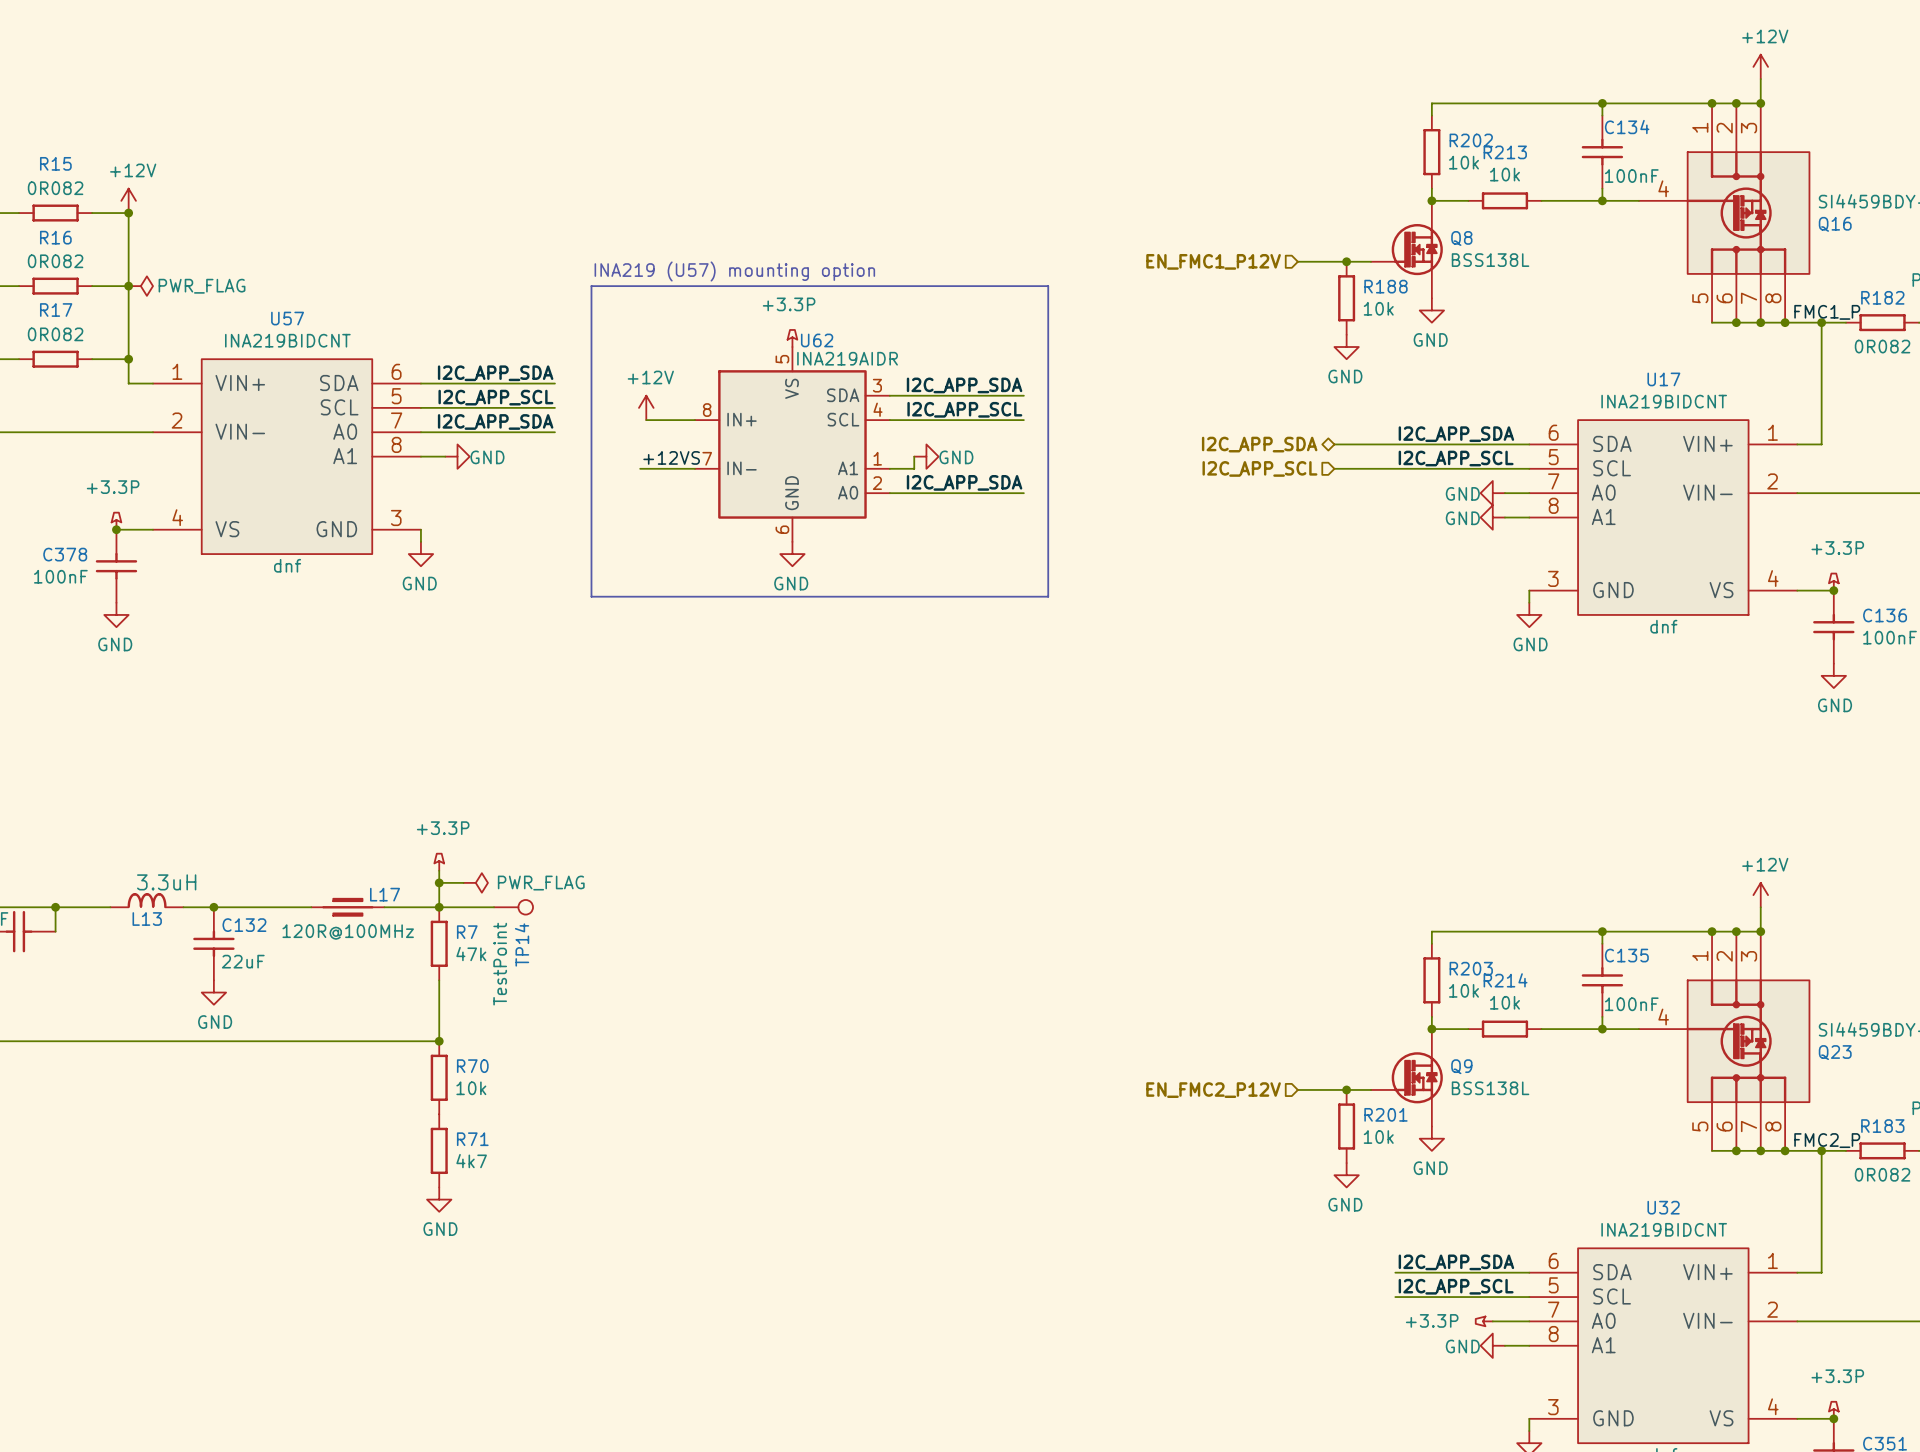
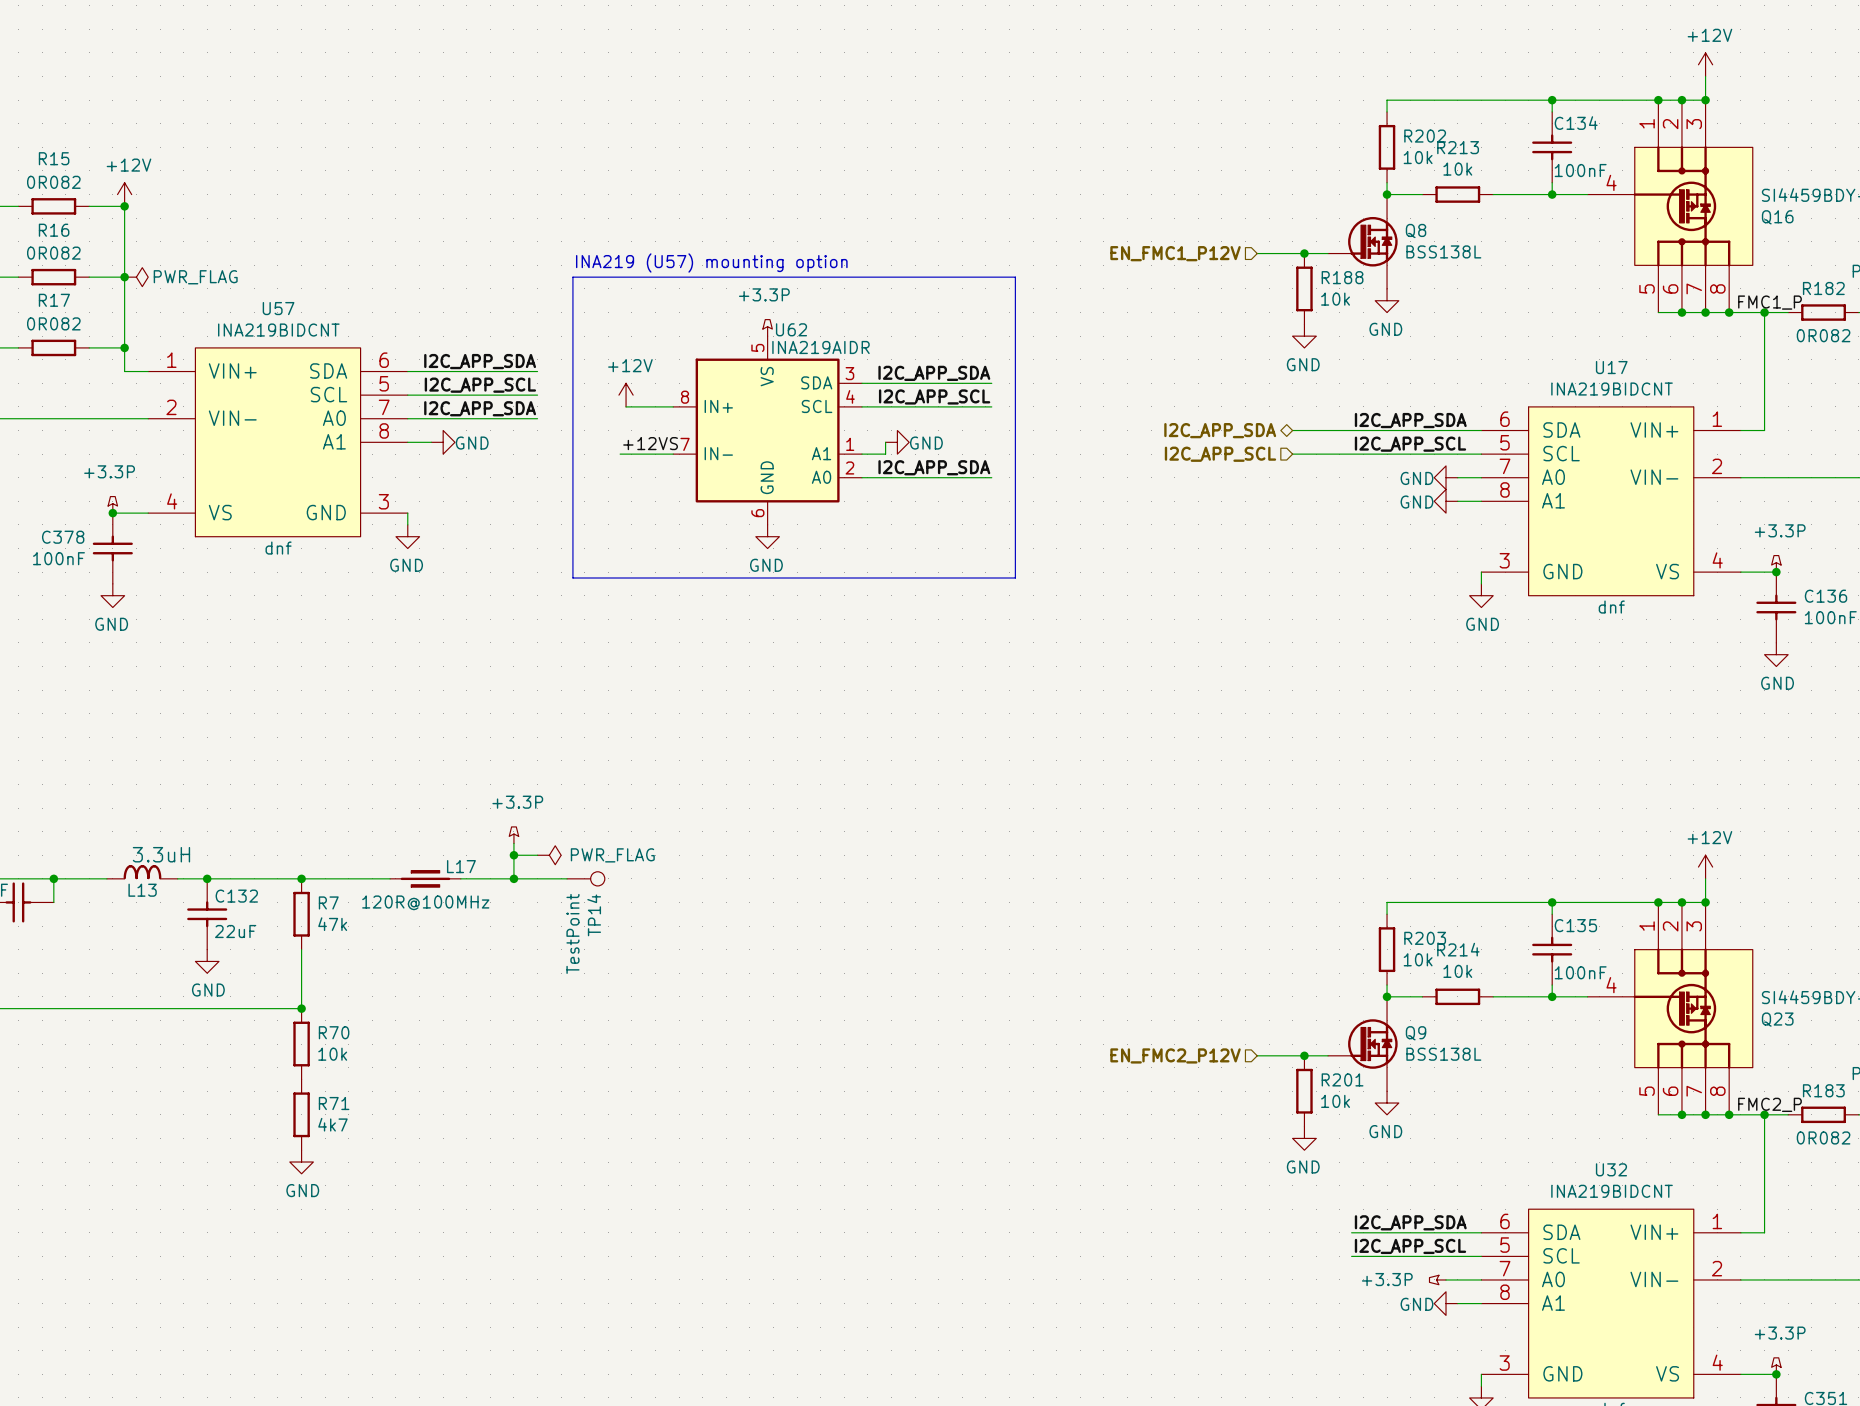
power symbol position: +3.3P (439, 862) -> +3.3P (513, 835)
wire: (439, 870) (439, 907) -> (513, 843) (513, 878)
wire: (439, 882) (463, 882) -> (513, 855) (537, 855)
junction: (439, 882) -> none
power symbol position: PWR_FLAG (475, 882) -> PWR_FLAG (549, 855)
junction: none -> (513, 855)
junction: none -> (301, 878)
L17 position: (347, 907) -> (425, 878)
junction: (439, 907) -> none
wire: none -> (478, 878) (567, 878)
TP14 position: (513, 907) -> (585, 878)
junction: none -> (513, 878)
R7 position: (439, 943) -> (301, 914)
wire: (439, 980) (439, 1041) (311, 1041) -> (301, 949) (301, 1008)
junction: none -> (301, 1008)
junction: (439, 1041) -> none
R70 position: (439, 1077) -> (301, 1044)
R71 position: (439, 1150) -> (301, 1114)
power symbol position: GND (439, 1199) -> GND (301, 1162)

